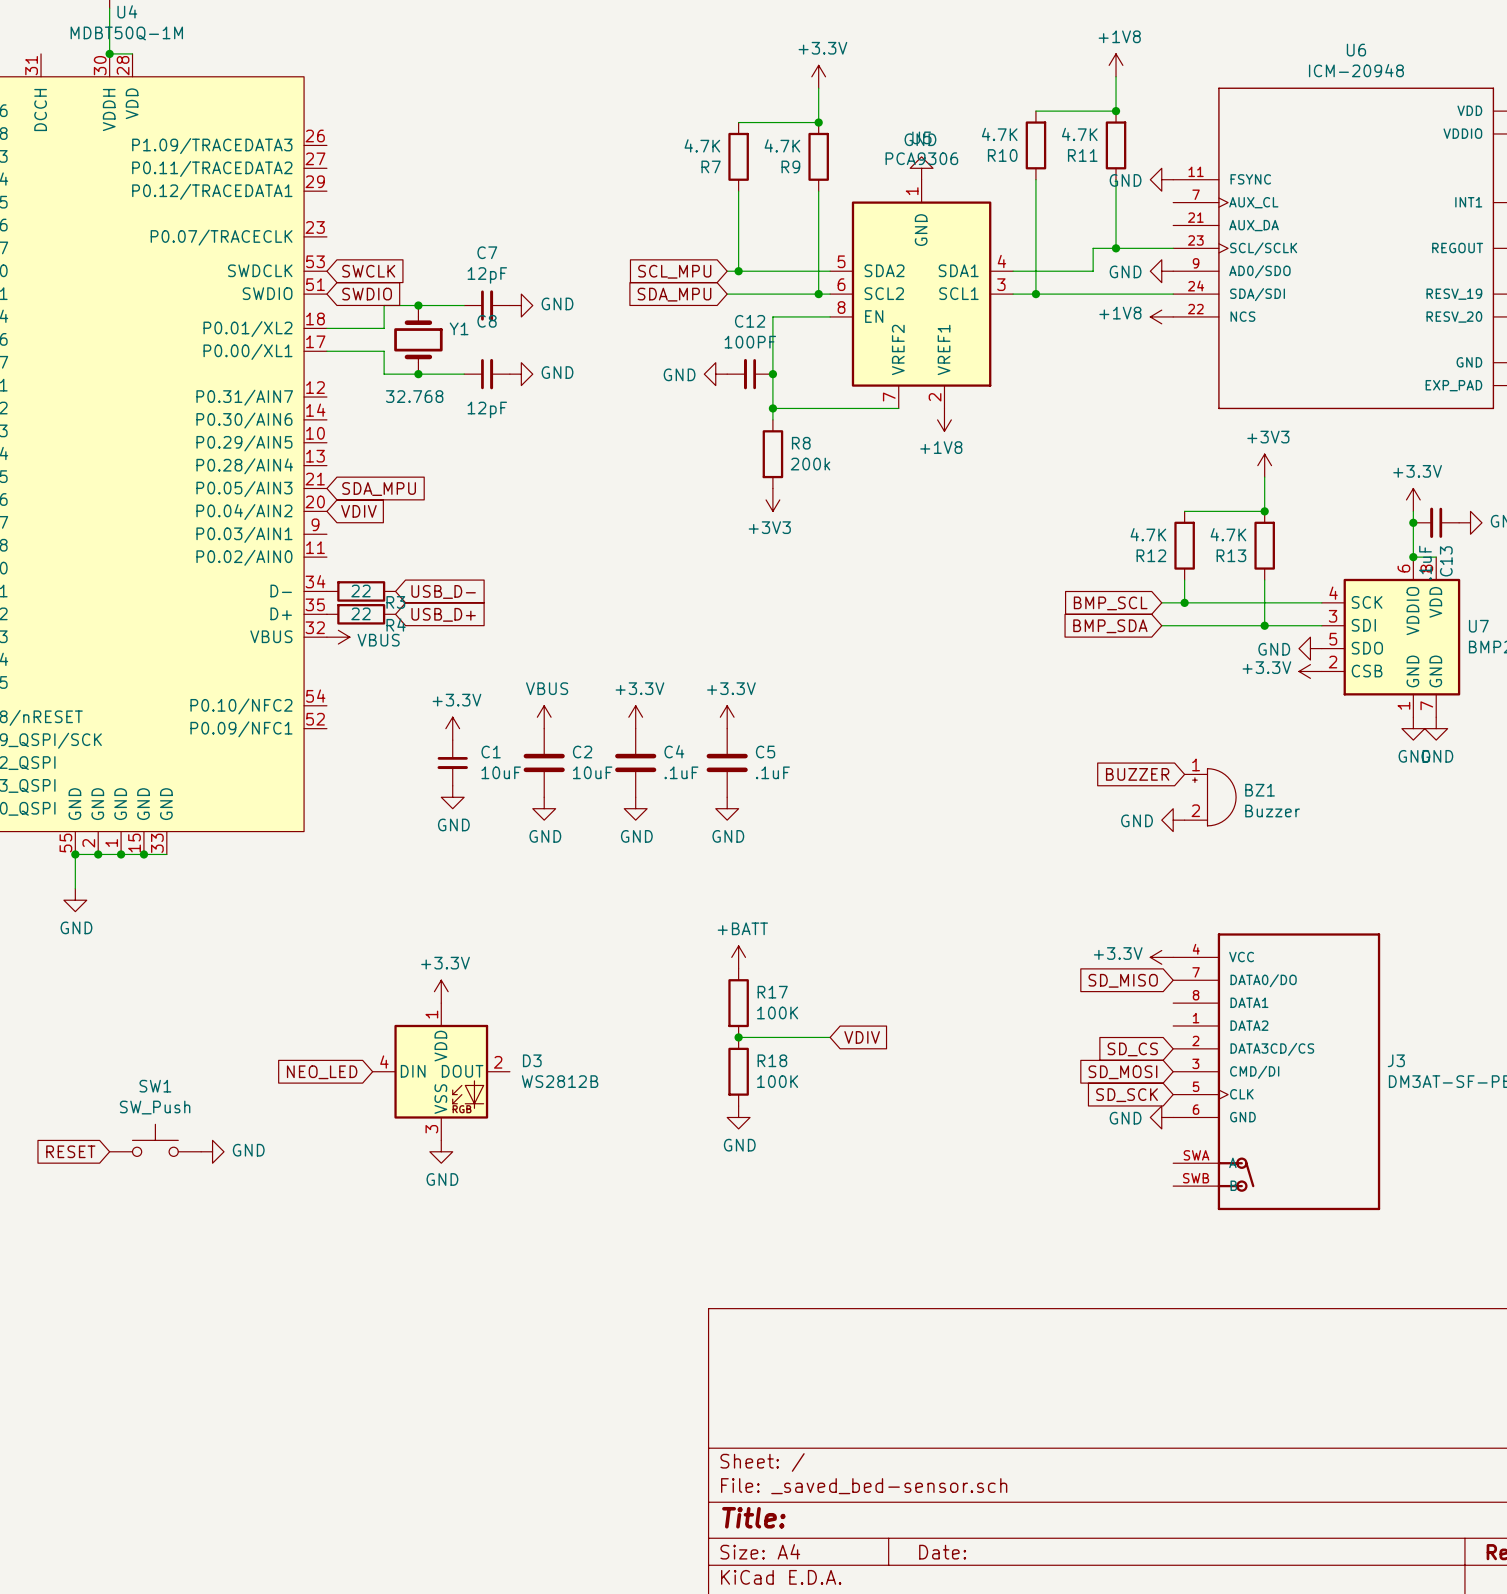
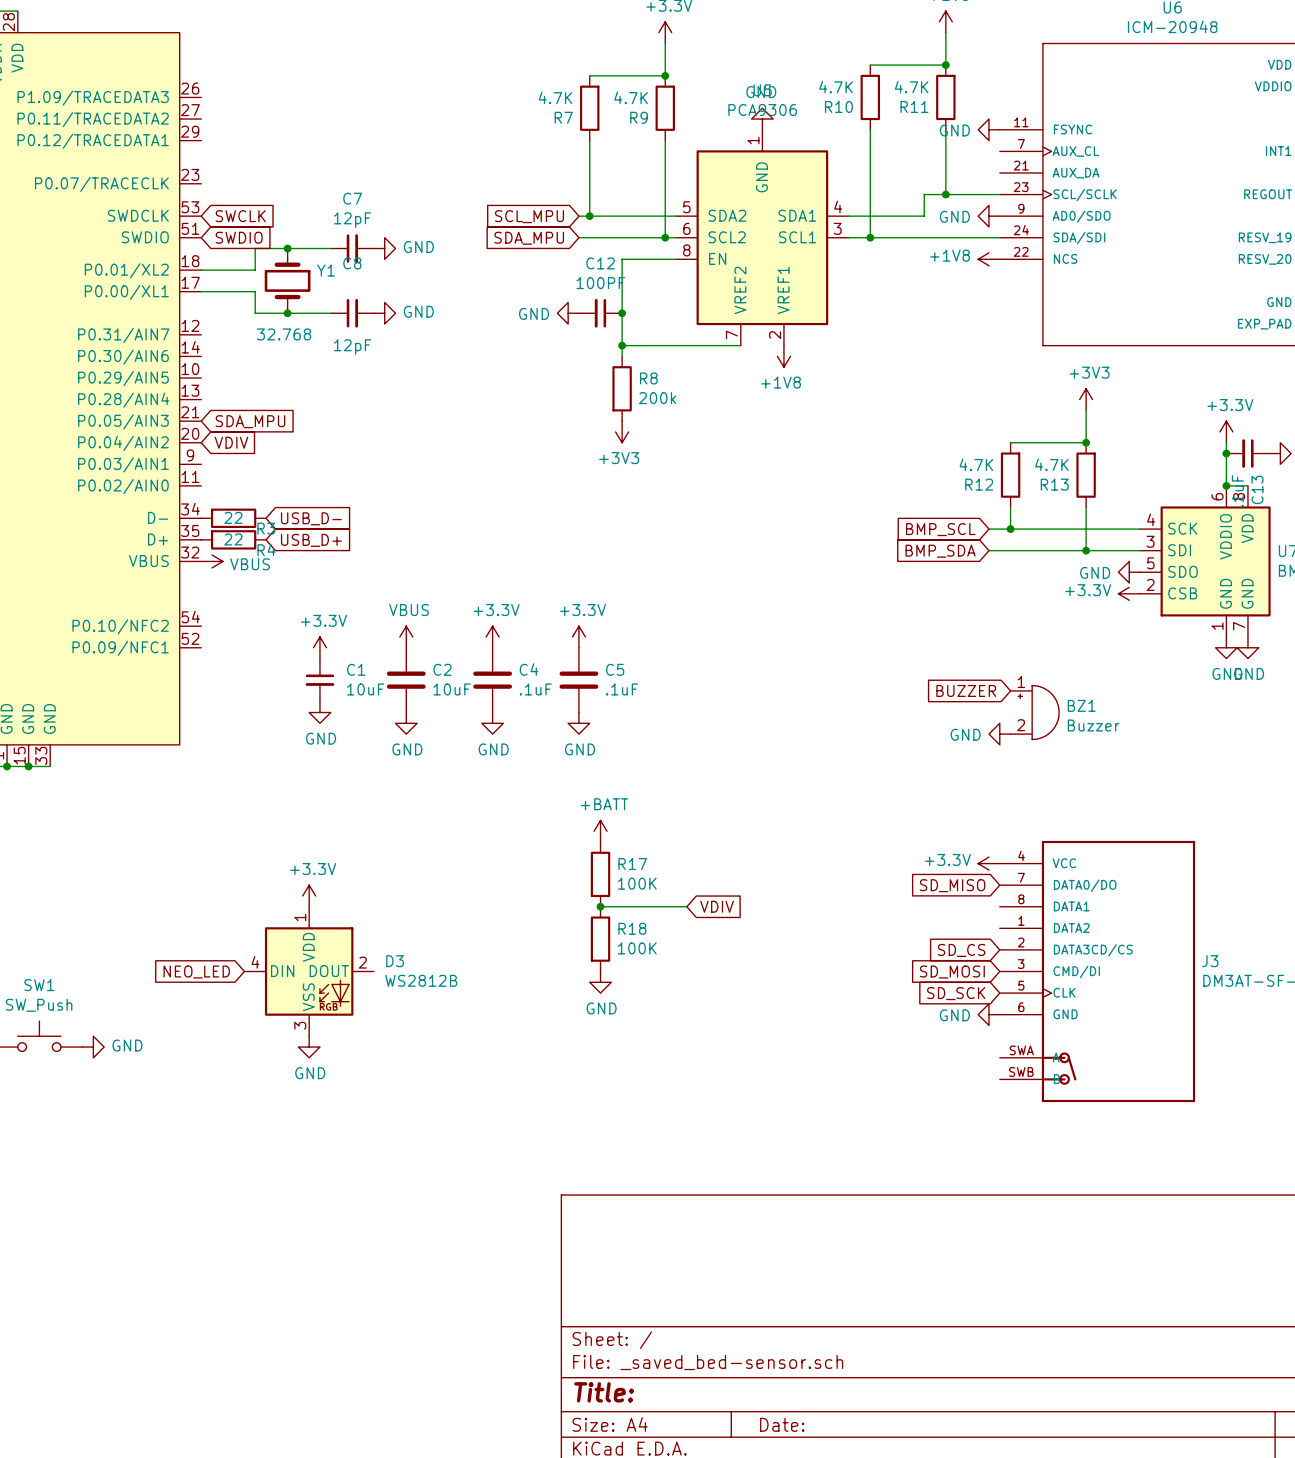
power symbol position: +BATT (738, 957) -> +BATT (600, 831)
R17 position: (738, 1003) -> (600, 874)
wire: (738, 1037) (830, 1037) -> (600, 906) (686, 906)
junction position: (738, 1037) -> (600, 906)
global label position: VDIV (862, 1037) -> VDIV (717, 906)
R18 position: (738, 1071) -> (600, 939)
power symbol position: GND (738, 1117) -> GND (600, 982)

